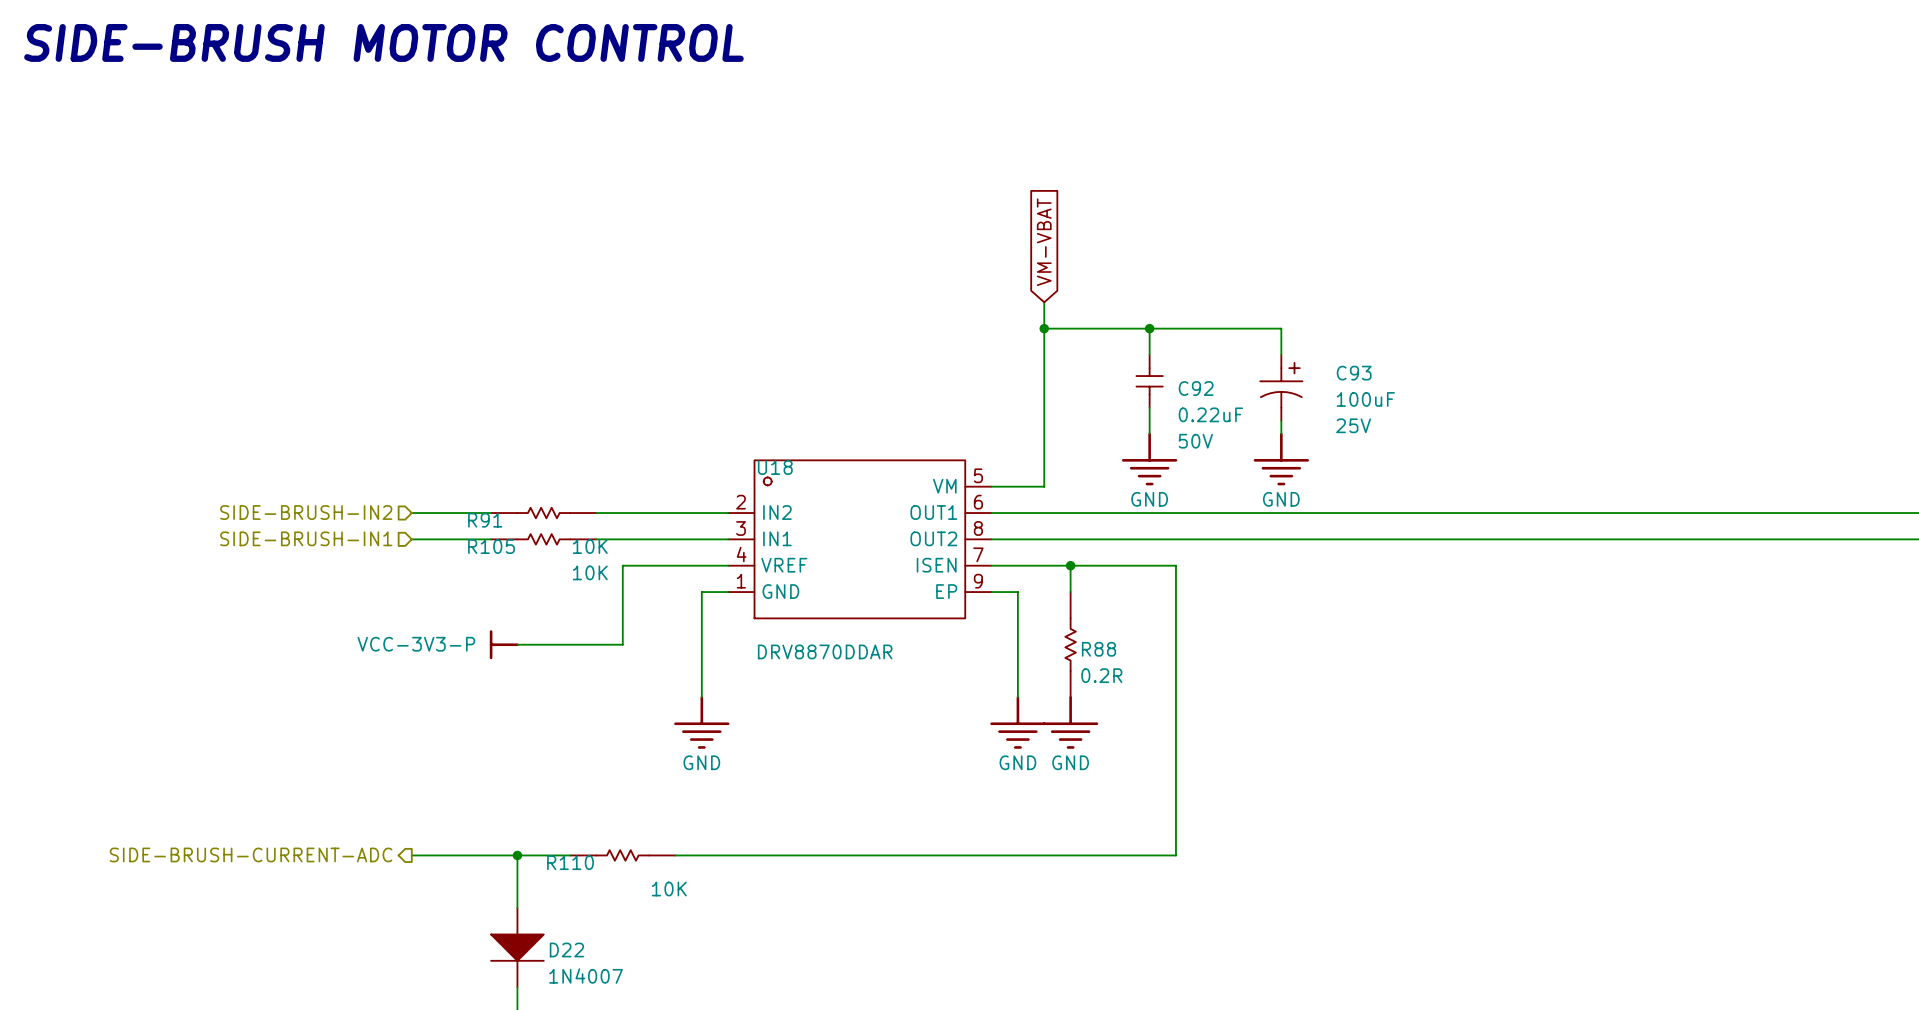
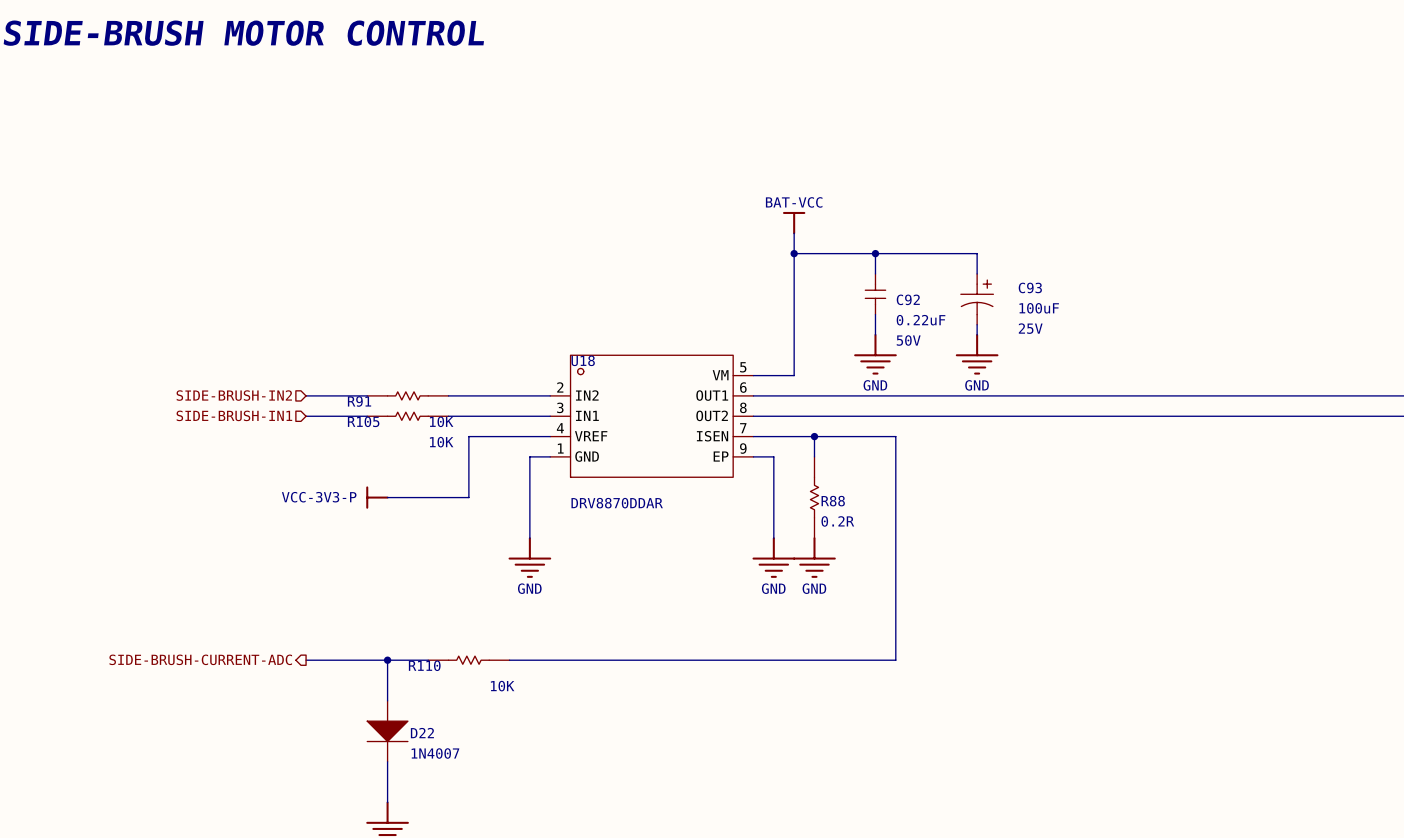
global label: VM-VBAT (1044, 242) -> none
power symbol: none -> BAT-VCC (794, 223)

